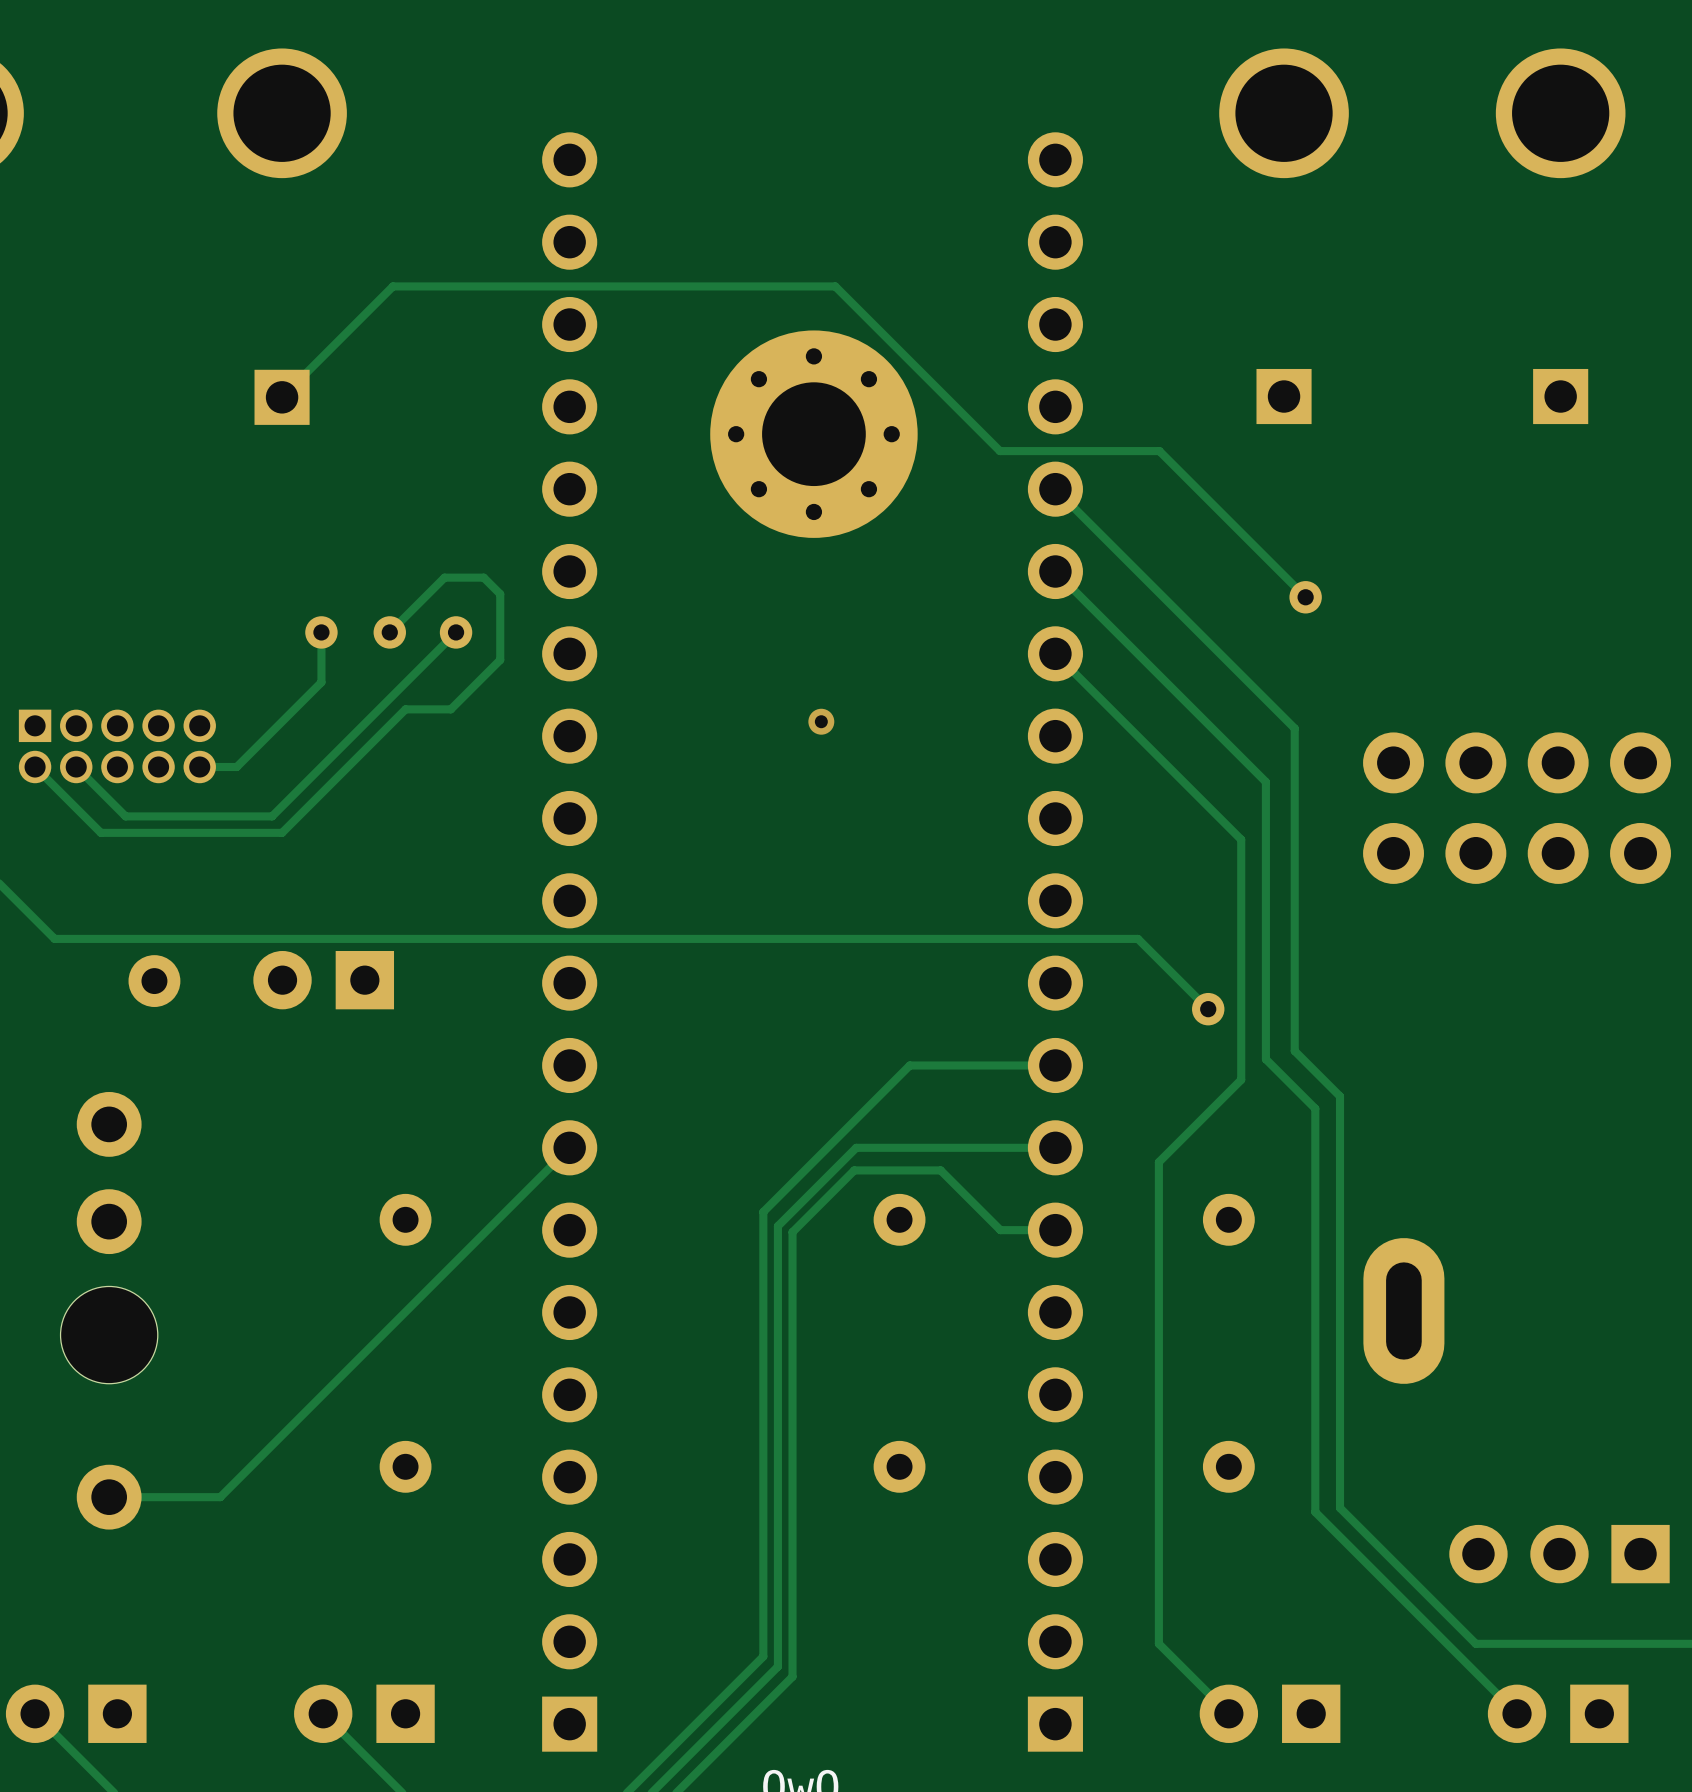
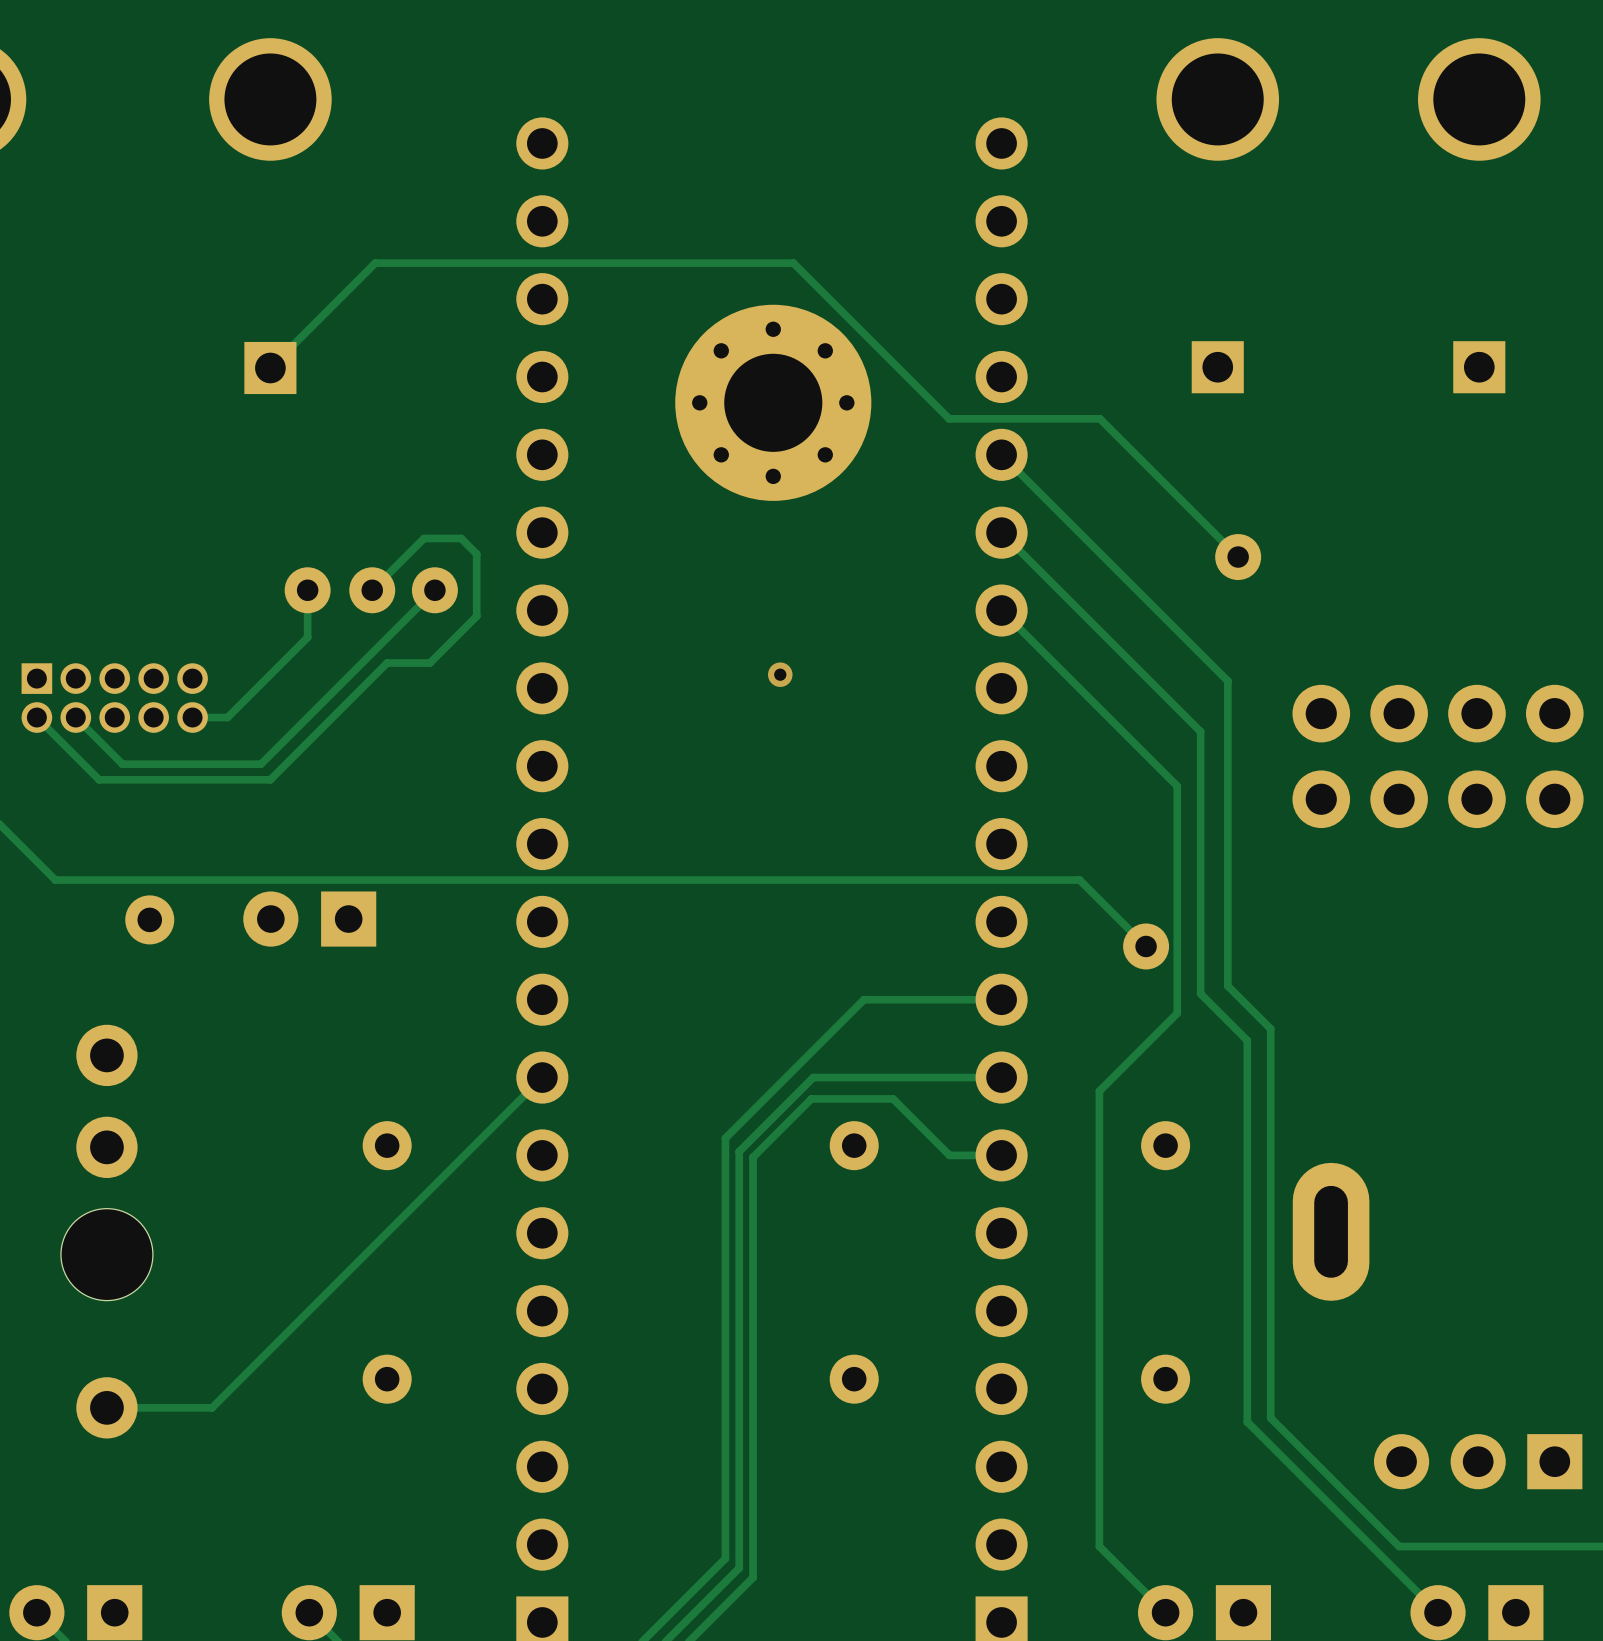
part footprint: [1289, 581, 1322, 614] -> [1215, 534, 1262, 581]
part footprint: [305, 616, 338, 649] -> [284, 567, 331, 614]
part footprint: [373, 616, 406, 649] -> [349, 567, 396, 614]
part footprint: [439, 616, 473, 649] -> [411, 567, 458, 614]
part footprint: [1192, 992, 1225, 1026] -> [1123, 923, 1170, 970]

